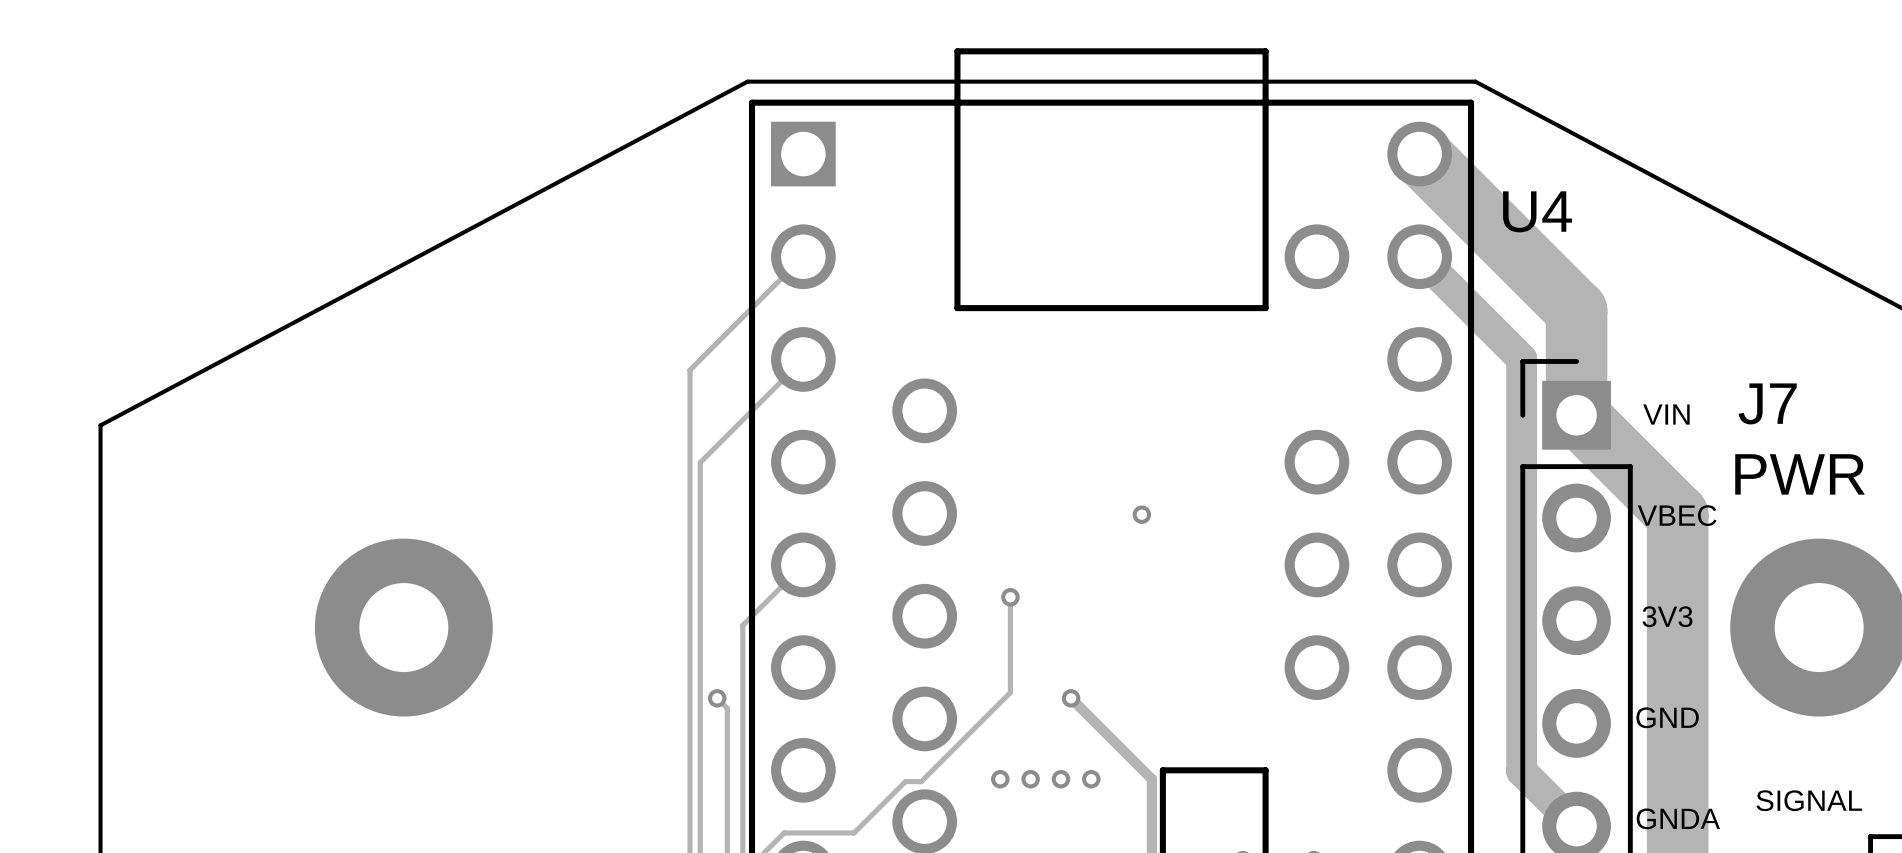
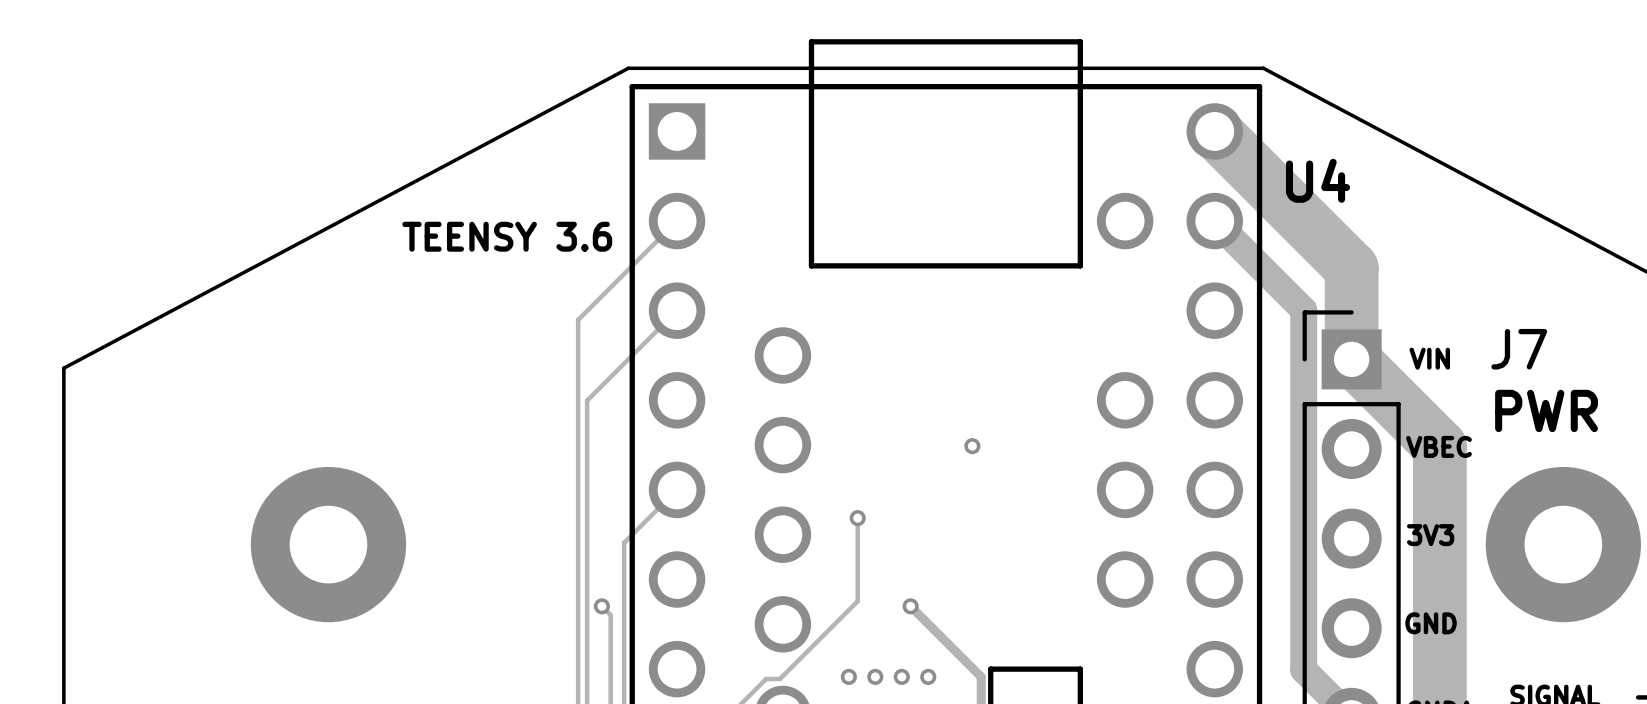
text: none -> TEENSY 3.6 (507, 236)

